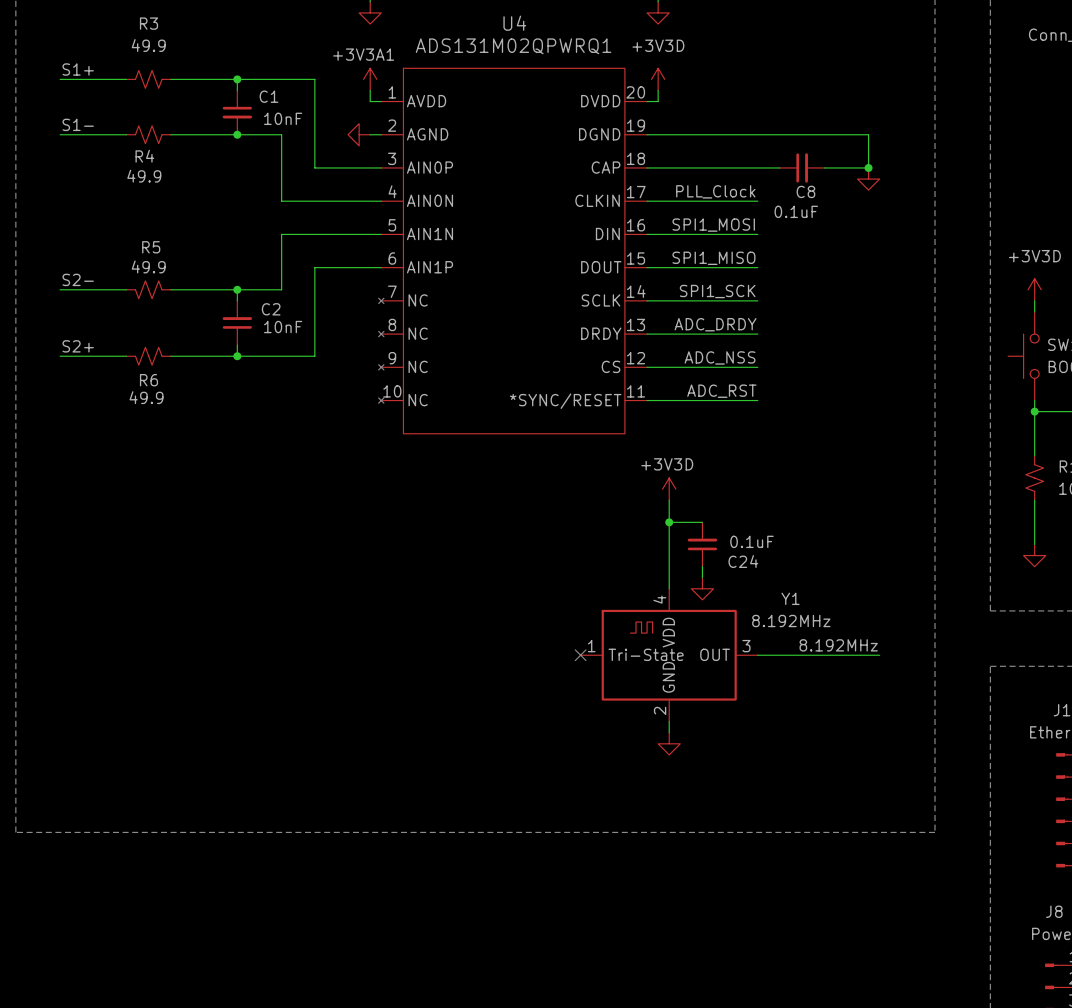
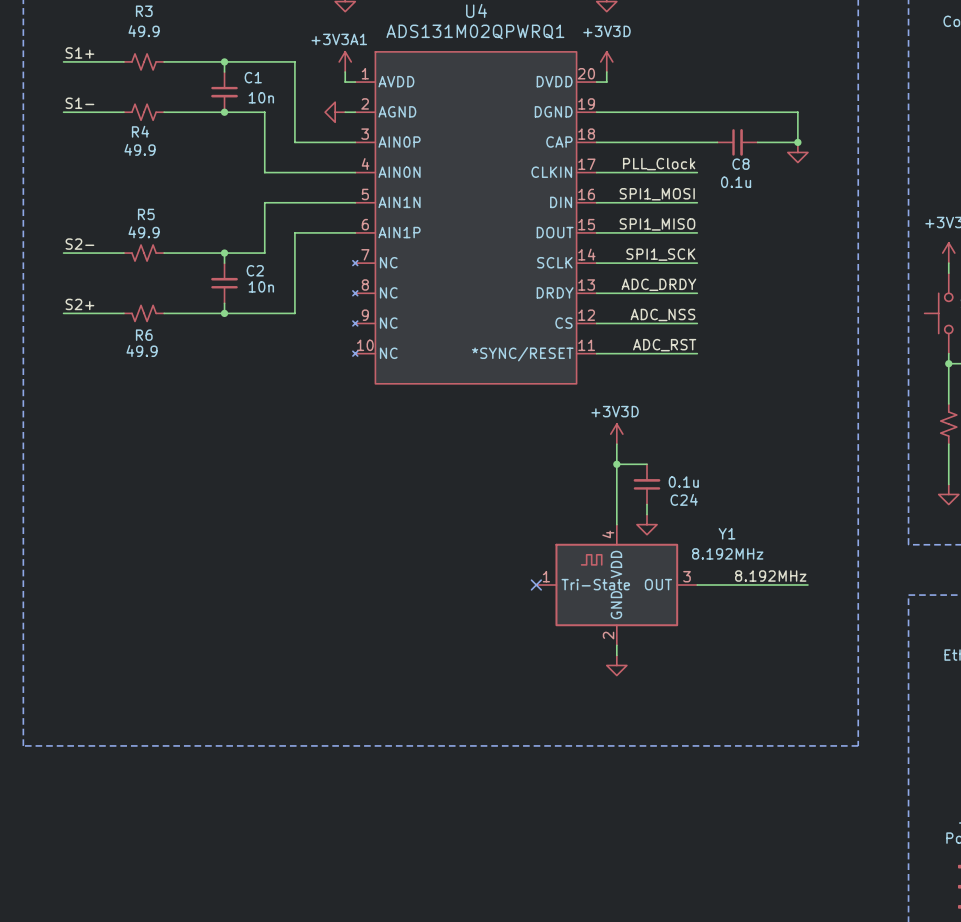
C1 value: 10nF (283, 118) -> 10n (261, 97)
C8 value: 0.1uF (796, 211) -> 0.1u (736, 182)
C2 value: 10nF (283, 327) -> 10n (261, 286)
C24 value: 0.1uF (751, 541) -> 0.1u (683, 482)

